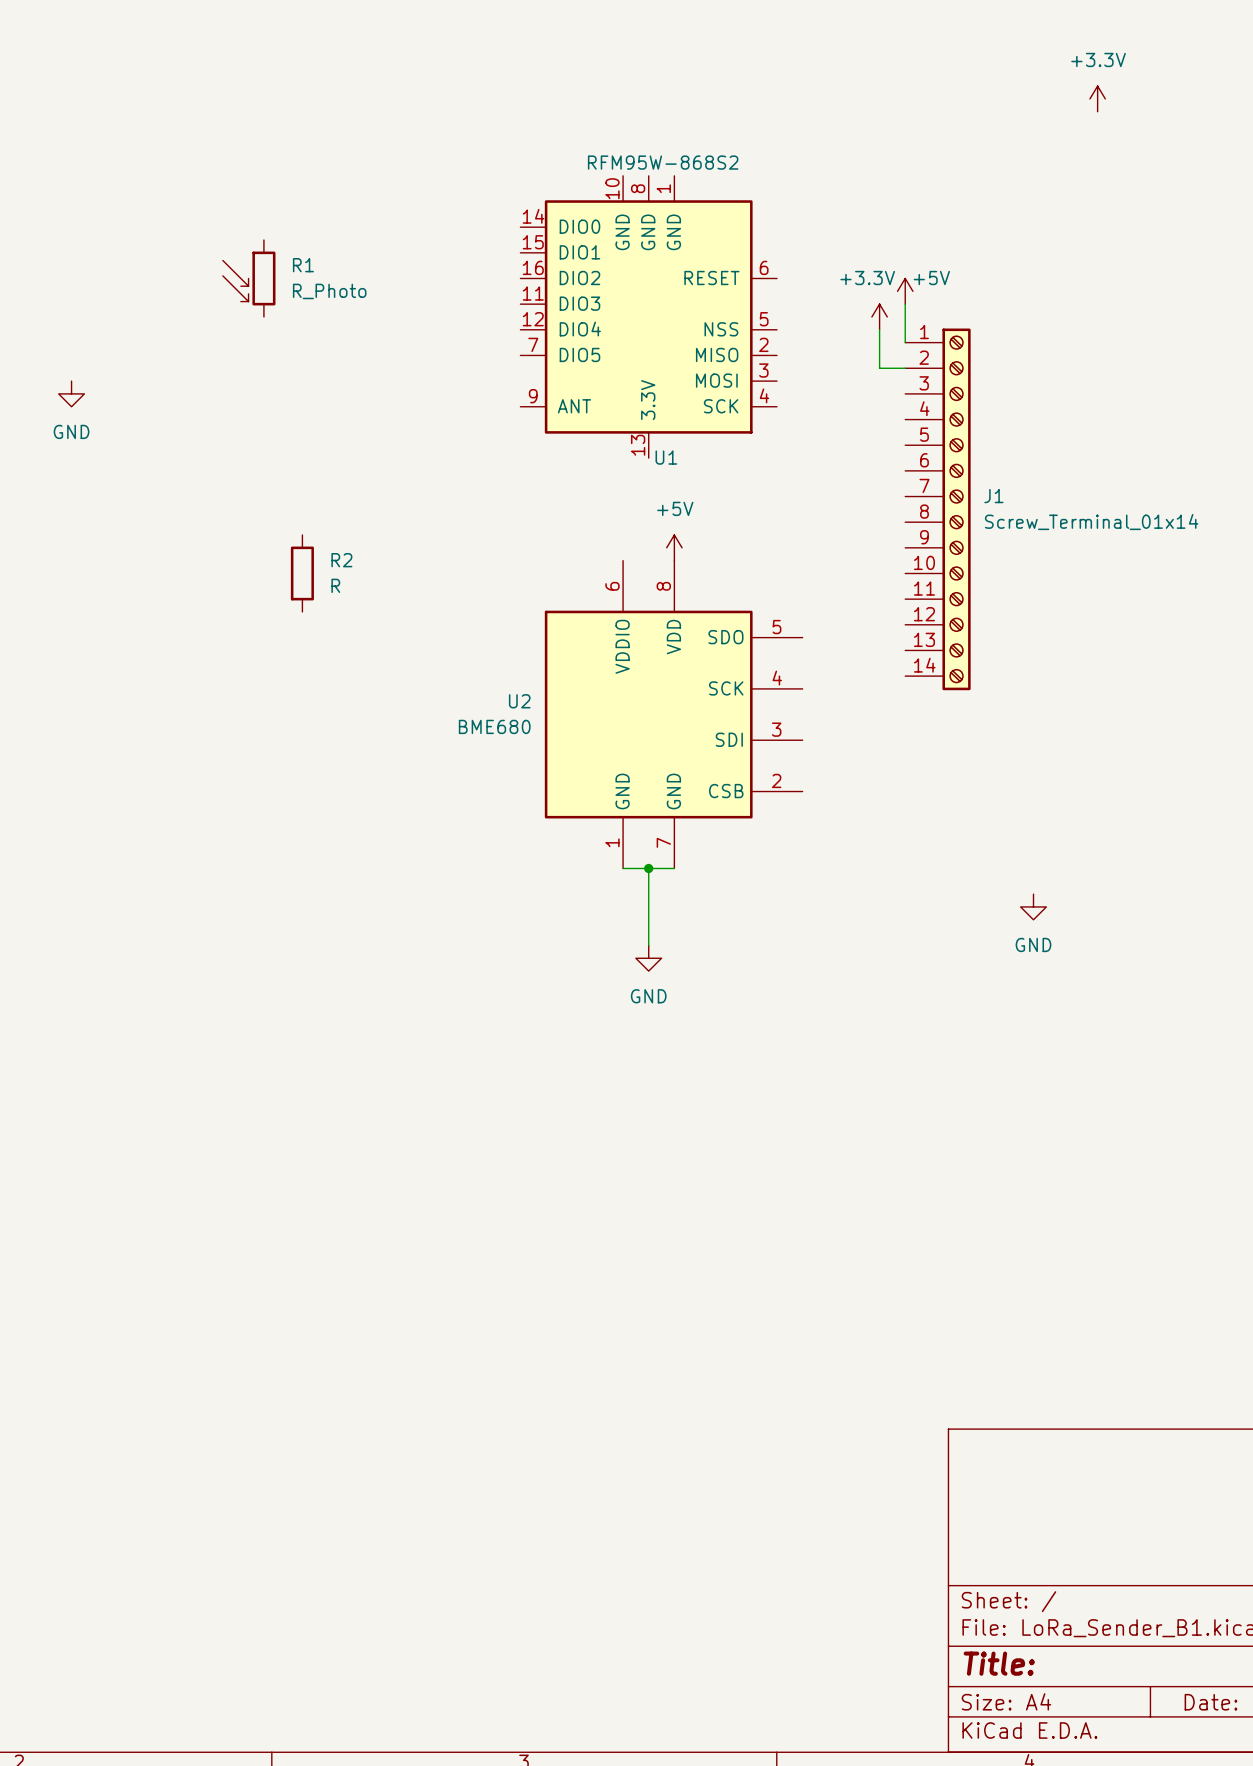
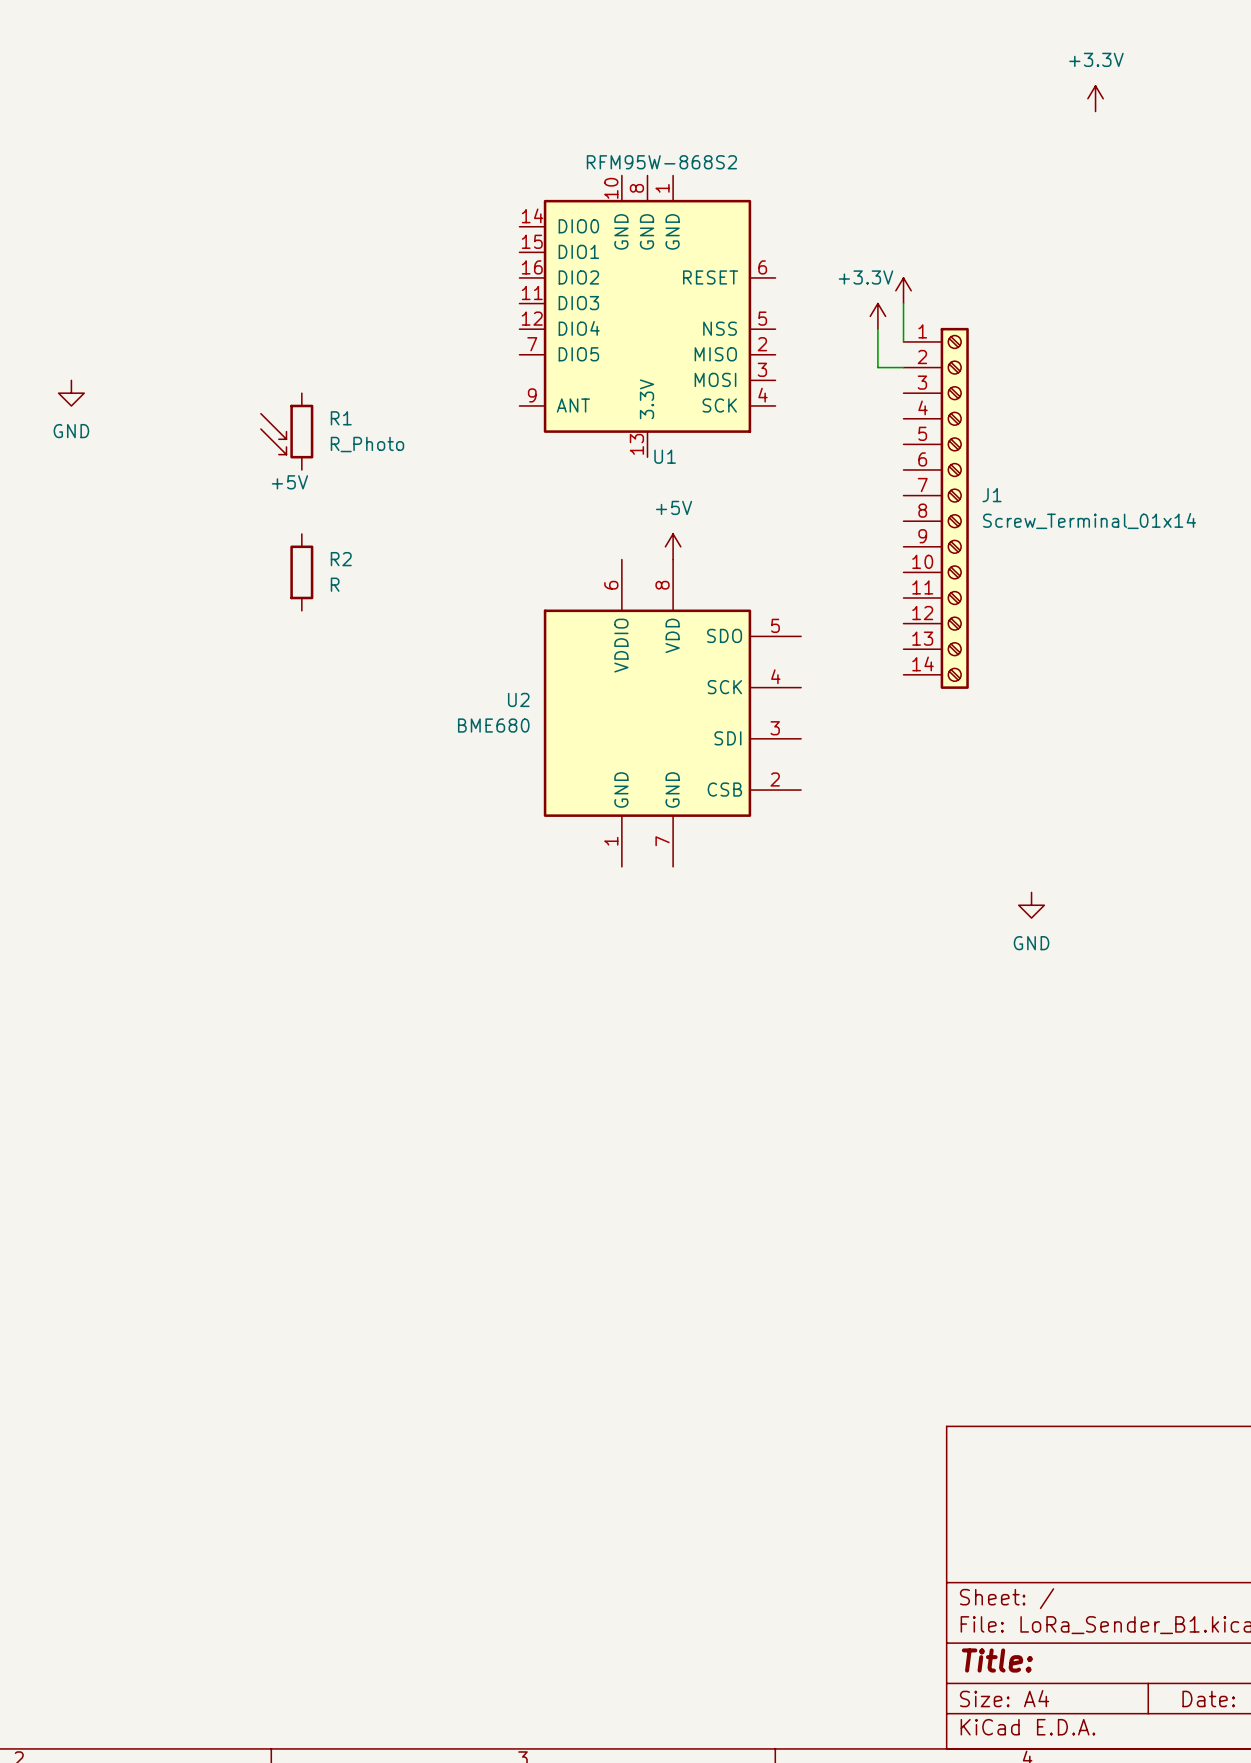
R1 position: (249, 278) -> (287, 431)
power symbol text position: +5V (931, 278) -> +5V (289, 482)
wire: (623, 868) (674, 868) -> none
wire: (648, 868) (648, 945) -> none
junction: (648, 868) -> none
power symbol: GND (648, 958) -> none

